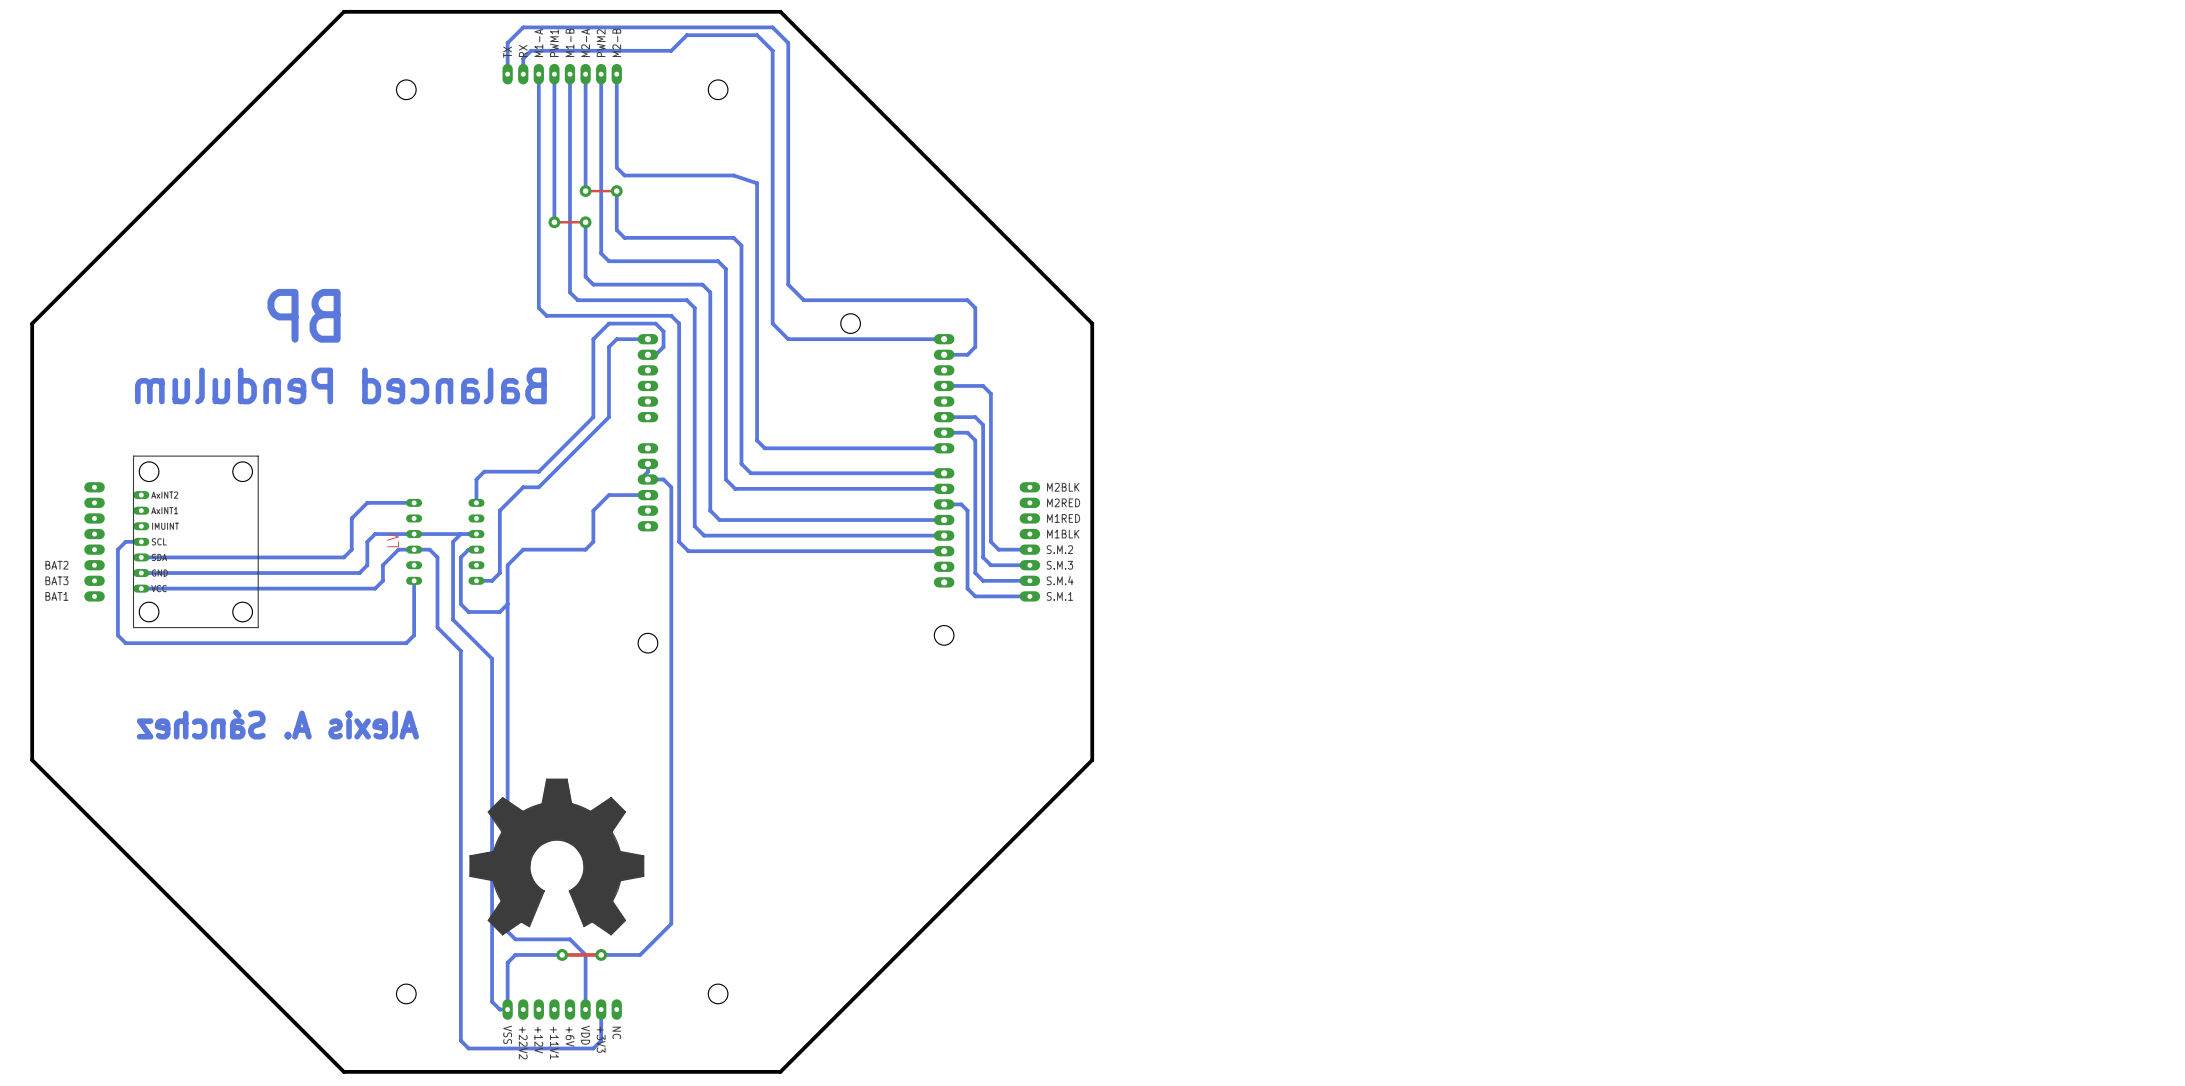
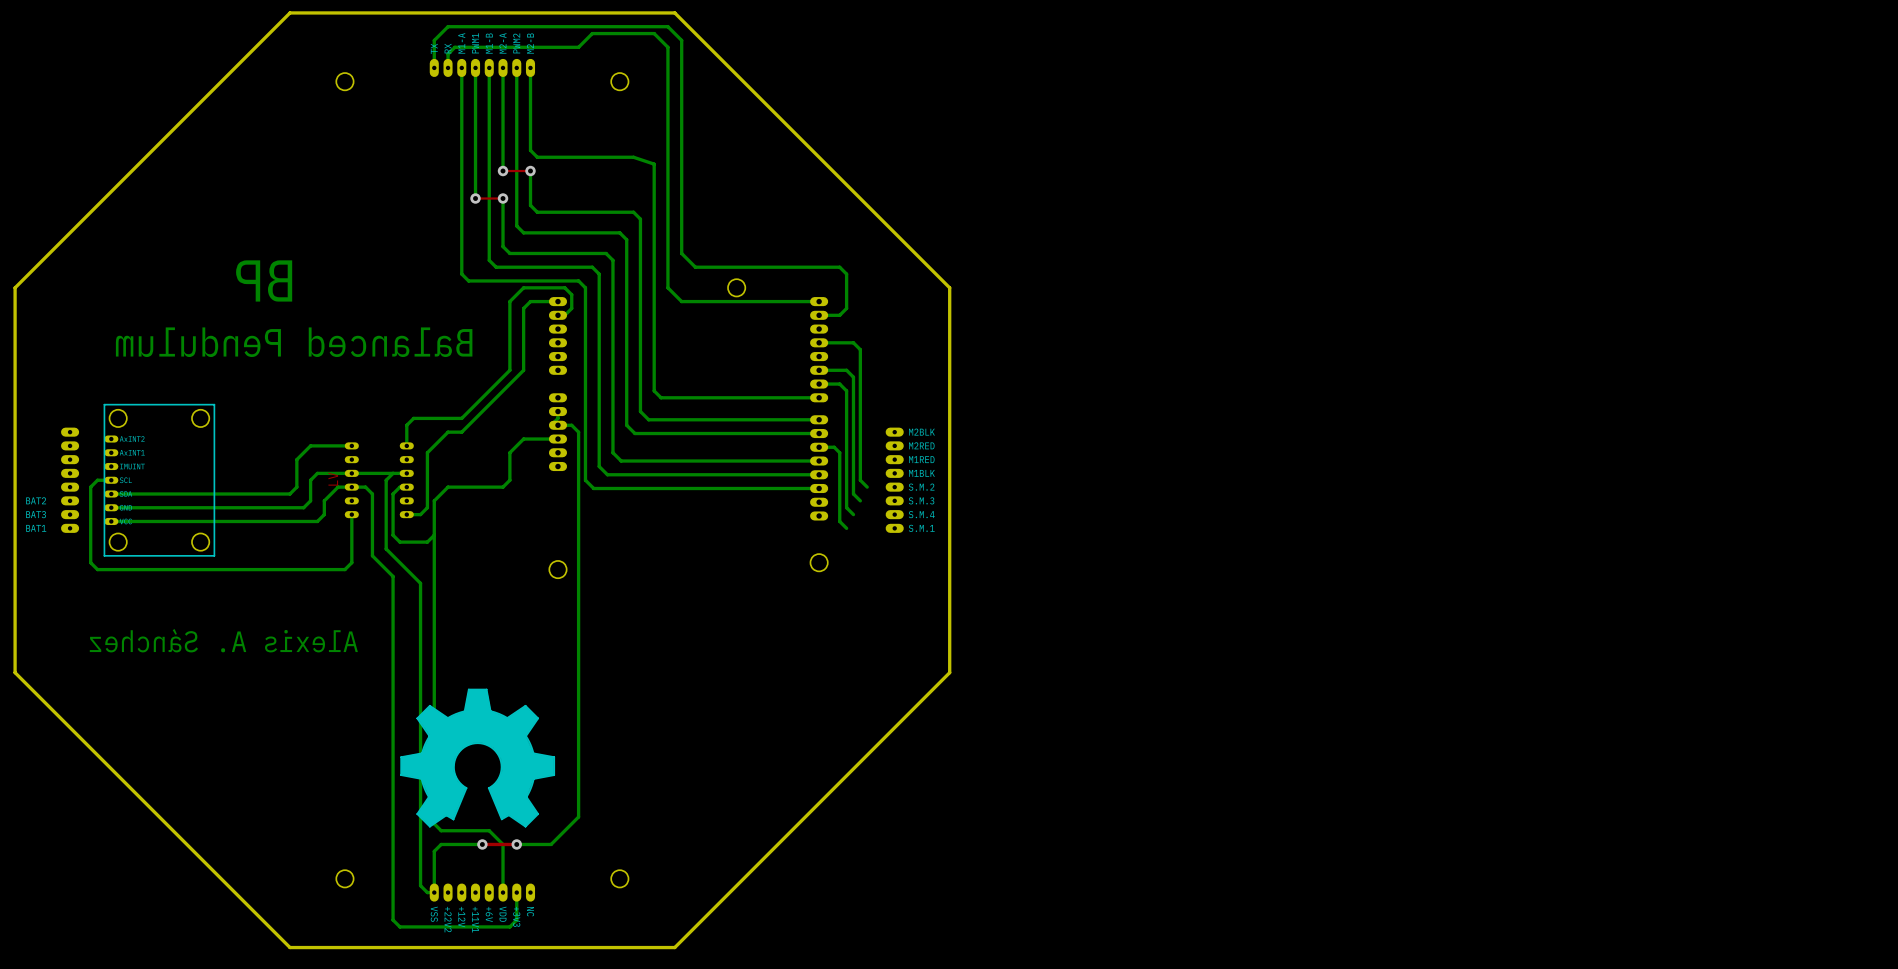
bottom track: (998, 549) (1029, 549) -> none
bottom track: (990, 565) (1029, 565) -> none
bottom track: (983, 580) (1029, 580) -> none
bottom track: (975, 596) (1029, 596) -> none

